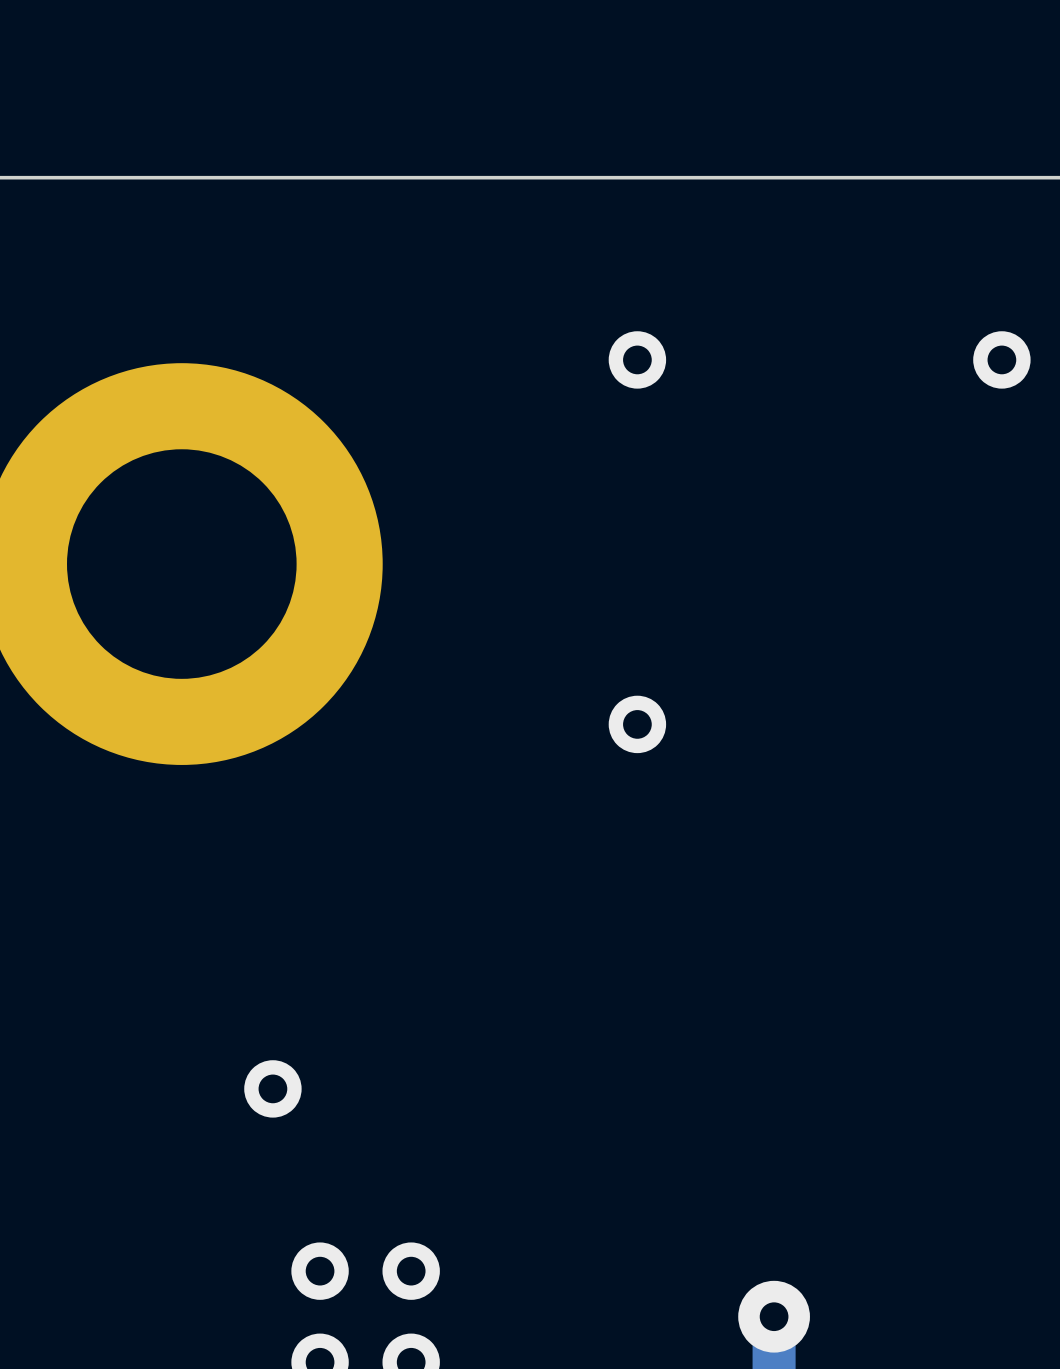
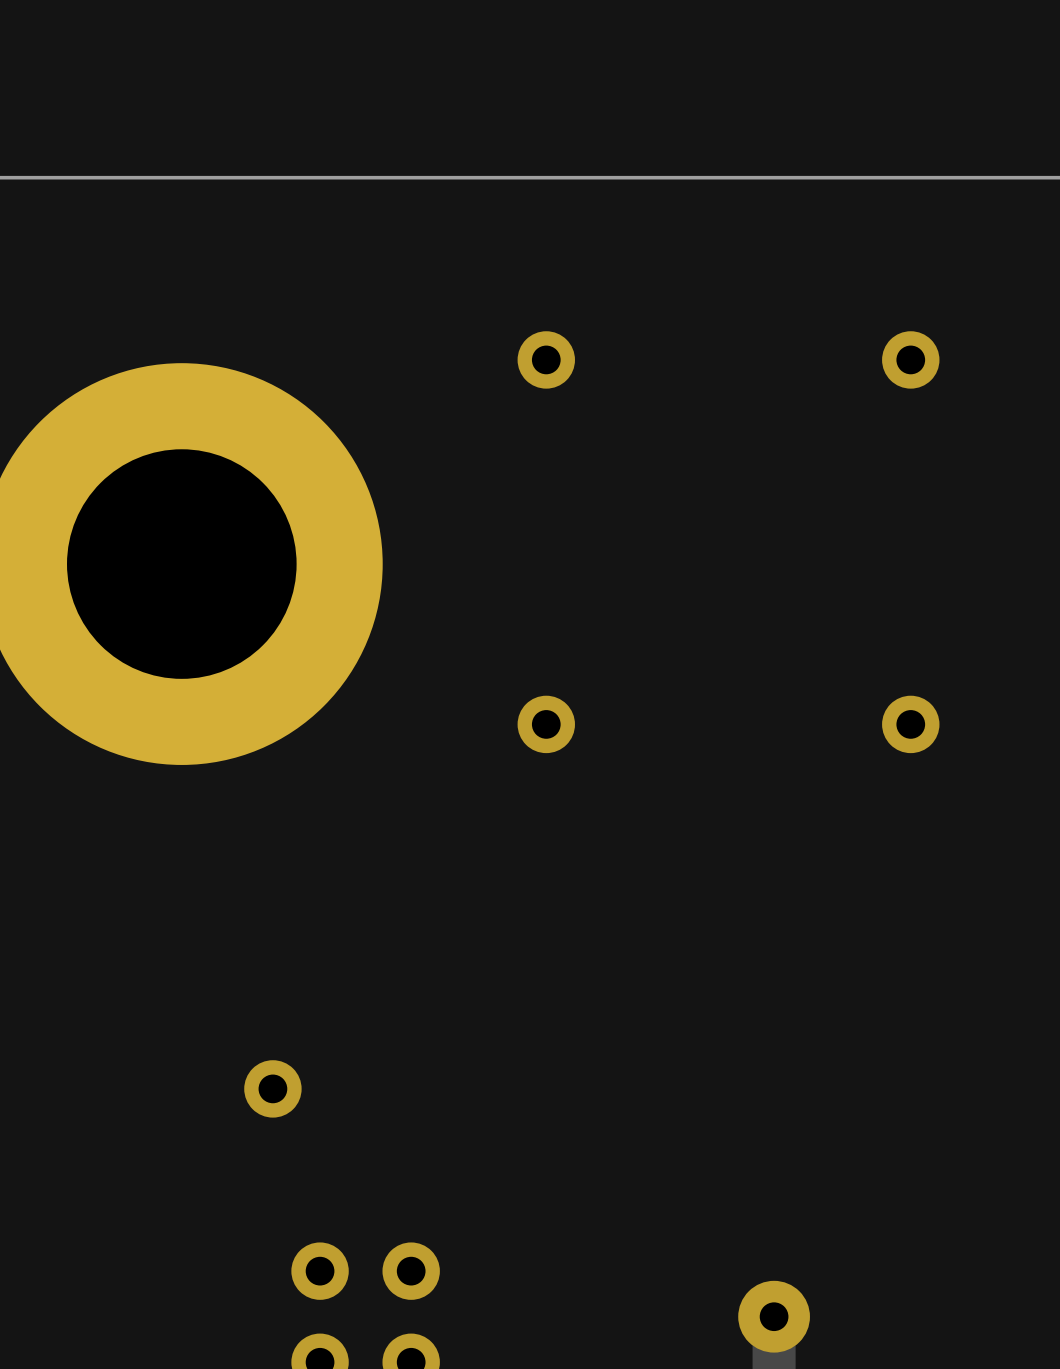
via position: (637, 359) -> (546, 359)
via position: (1001, 359) -> (910, 359)
via position: (637, 724) -> (546, 724)
via: none -> (910, 724)

